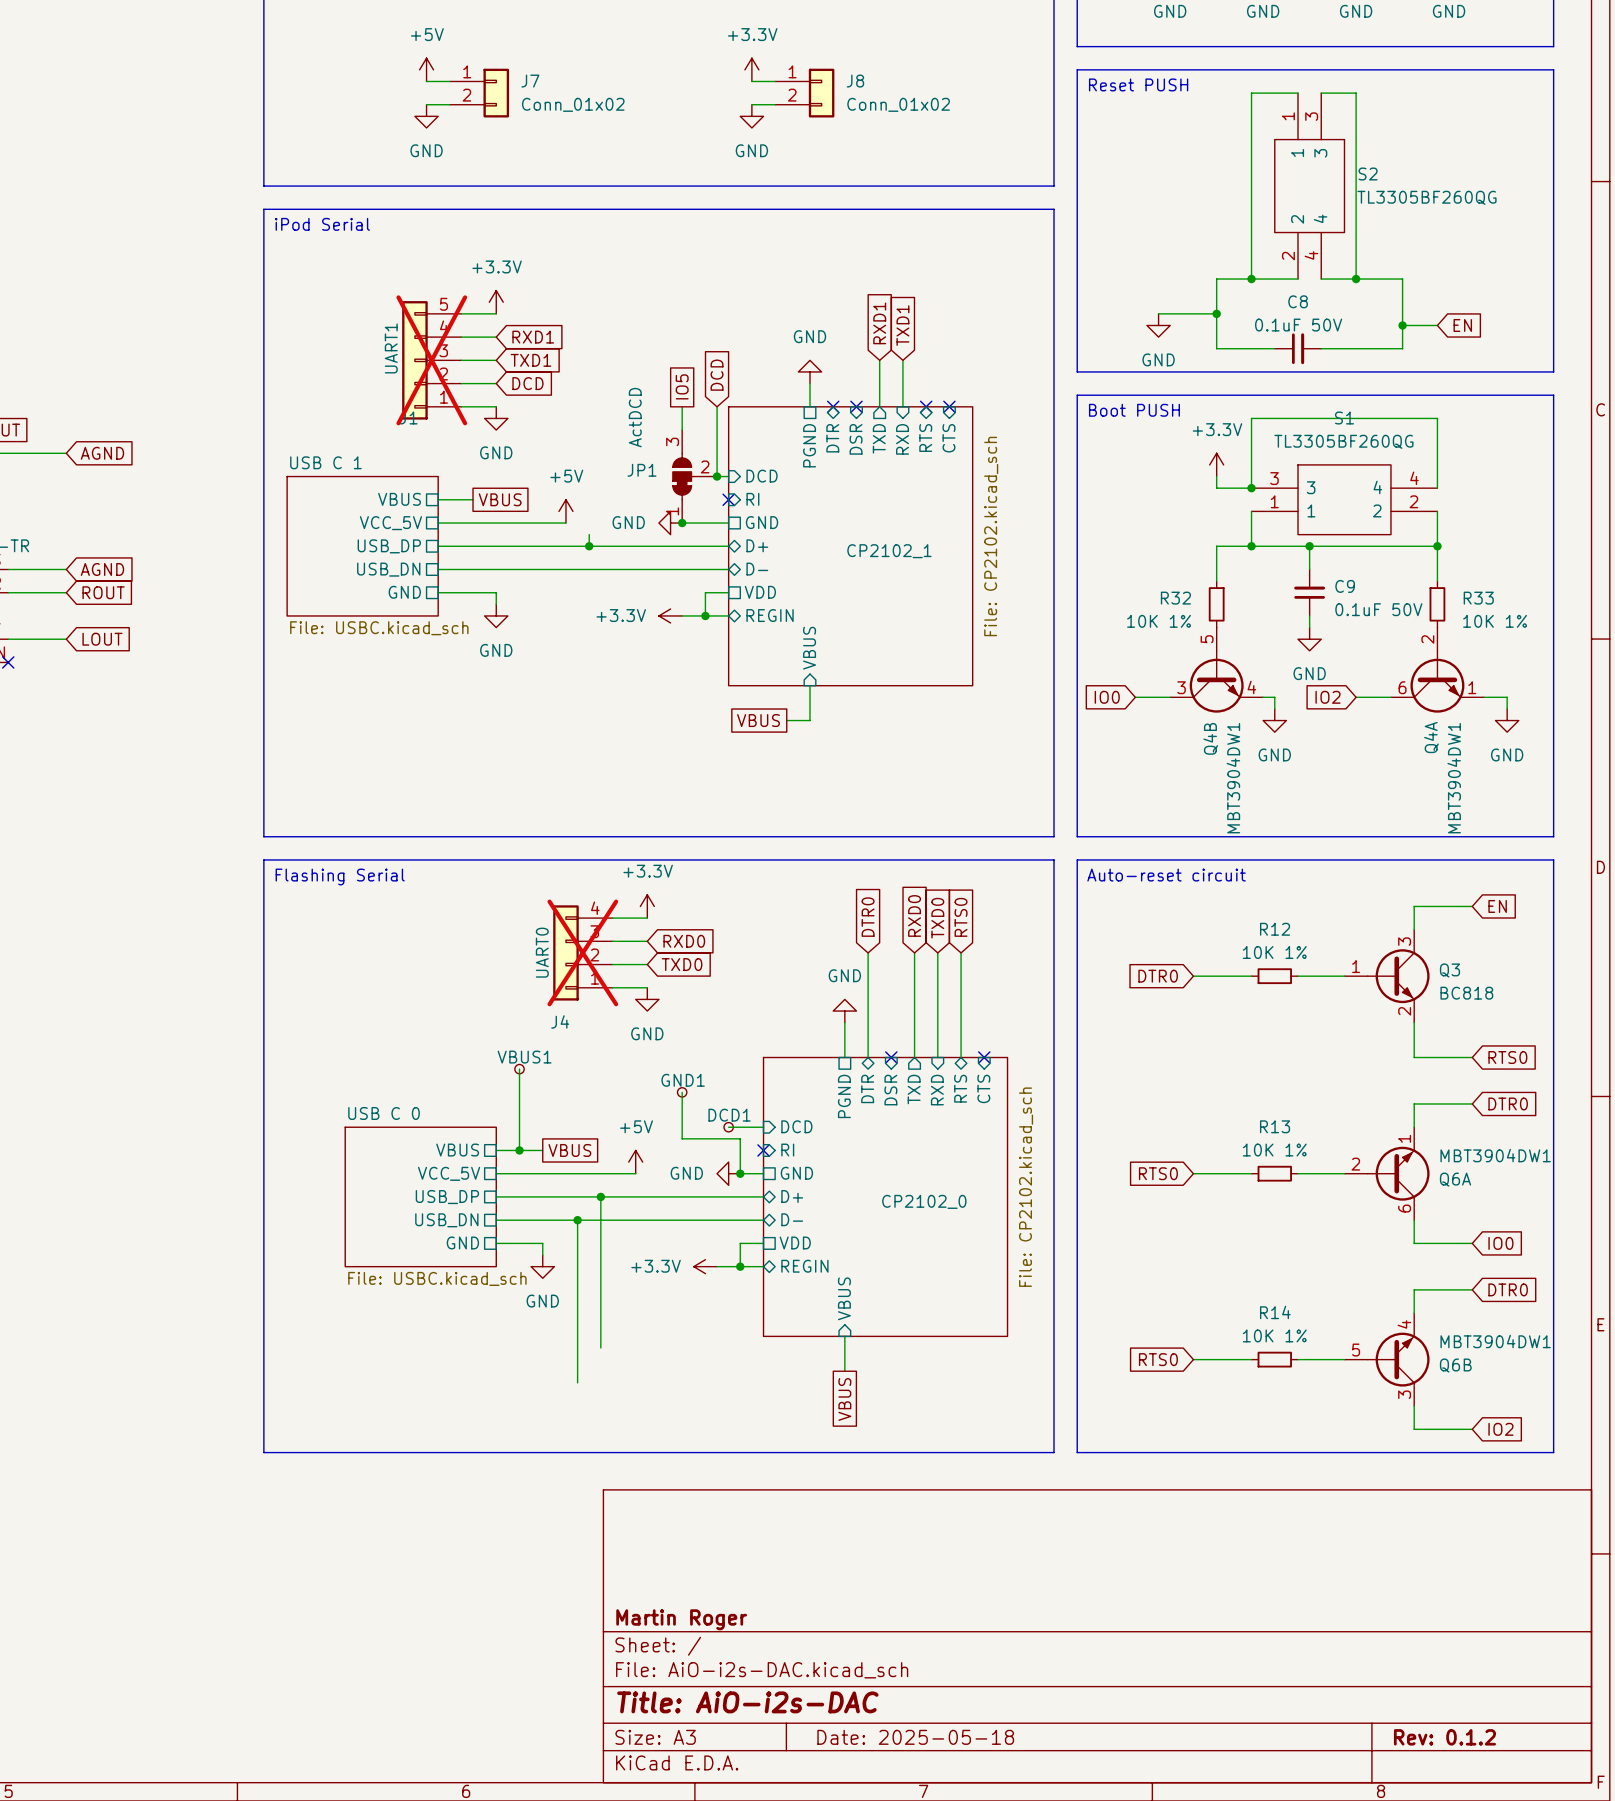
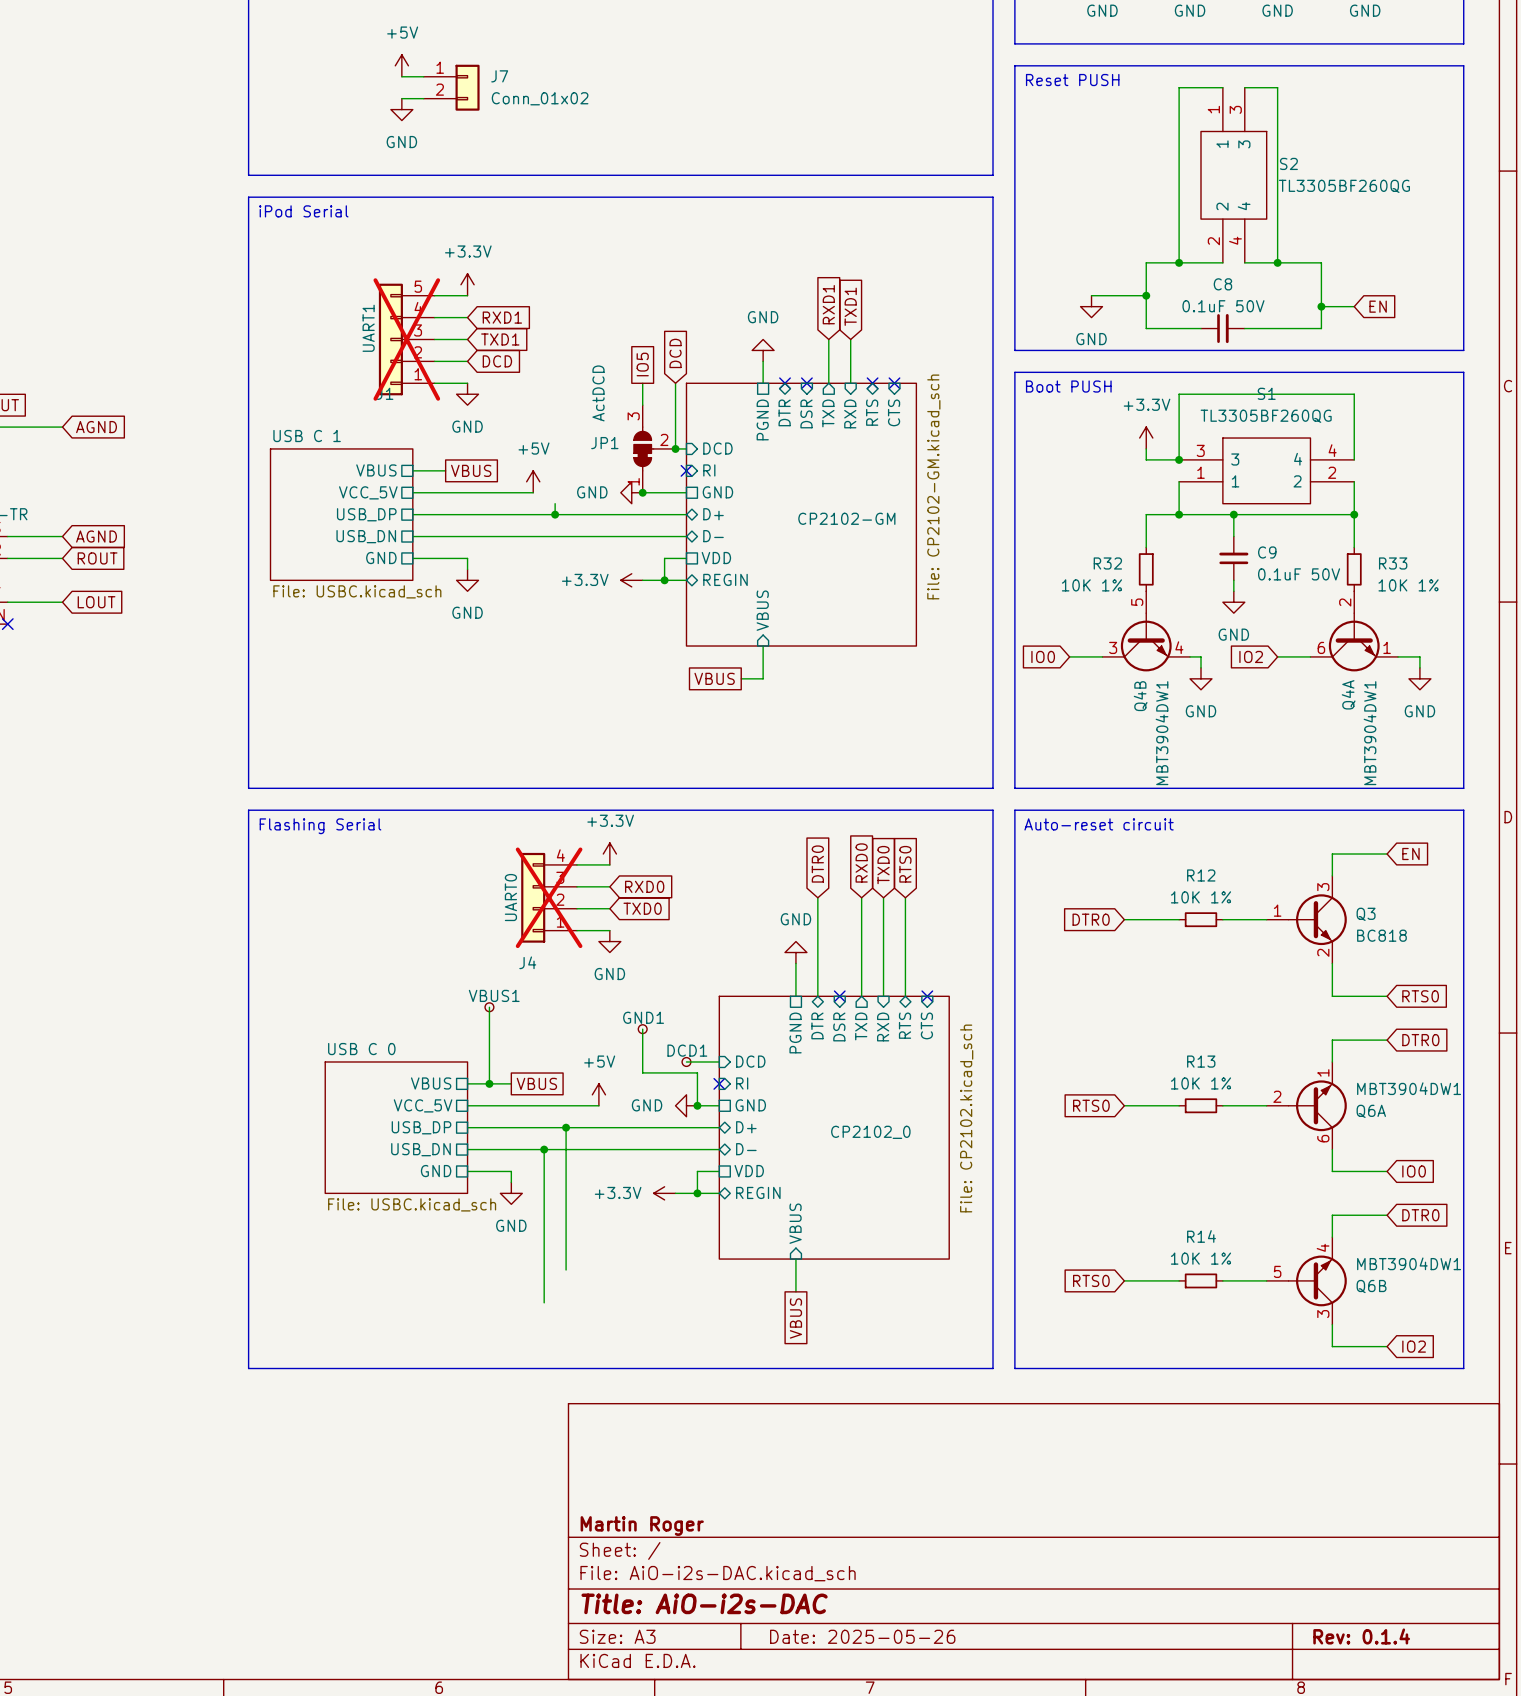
power symbol: +3.3V (751, 69) -> none
wire: (751, 81) (775, 81) -> none
J8: Conn_01x02 (804, 93) -> none
wire: (751, 104) (775, 104) -> none
power symbol: GND (751, 116) -> none
sheet CP2102_1 value: File: CP2102.kicad_sch (991, 536) -> File: CP2102-GM.kicad_sch (933, 486)
sheet CP2102_1 name: CP2102_1 (889, 551) -> CP2102-GM (846, 518)
title block: Date: 2025-05-18 (915, 1737) -> Date: 2025-05-26 (862, 1636)
title block: Rev: 0.1.2 (1444, 1737) -> Rev: 0.1.4 (1361, 1636)

